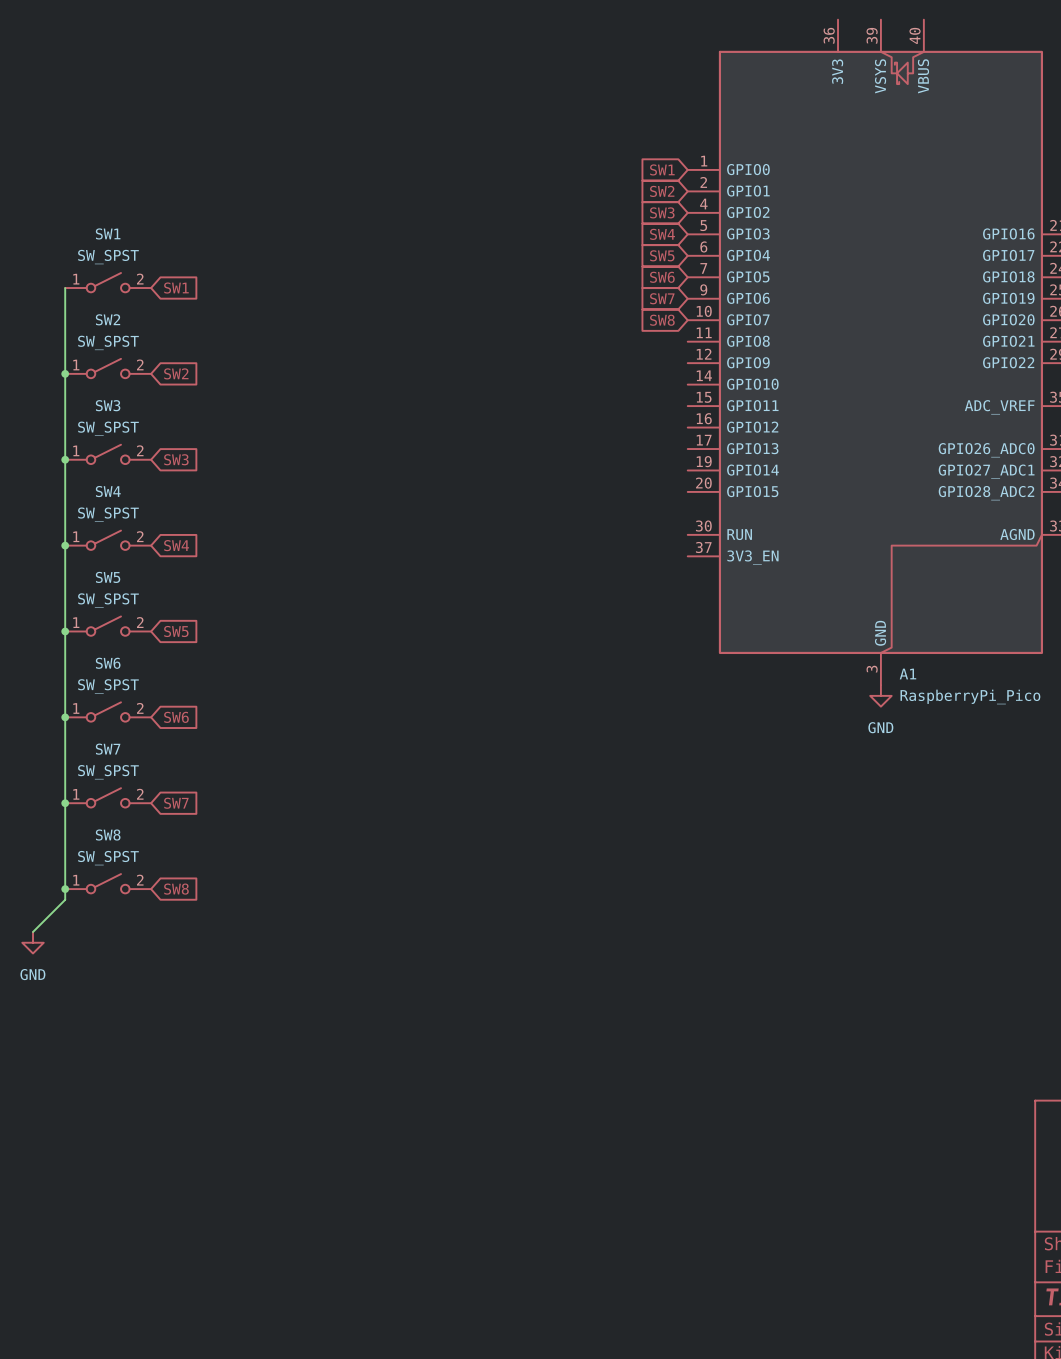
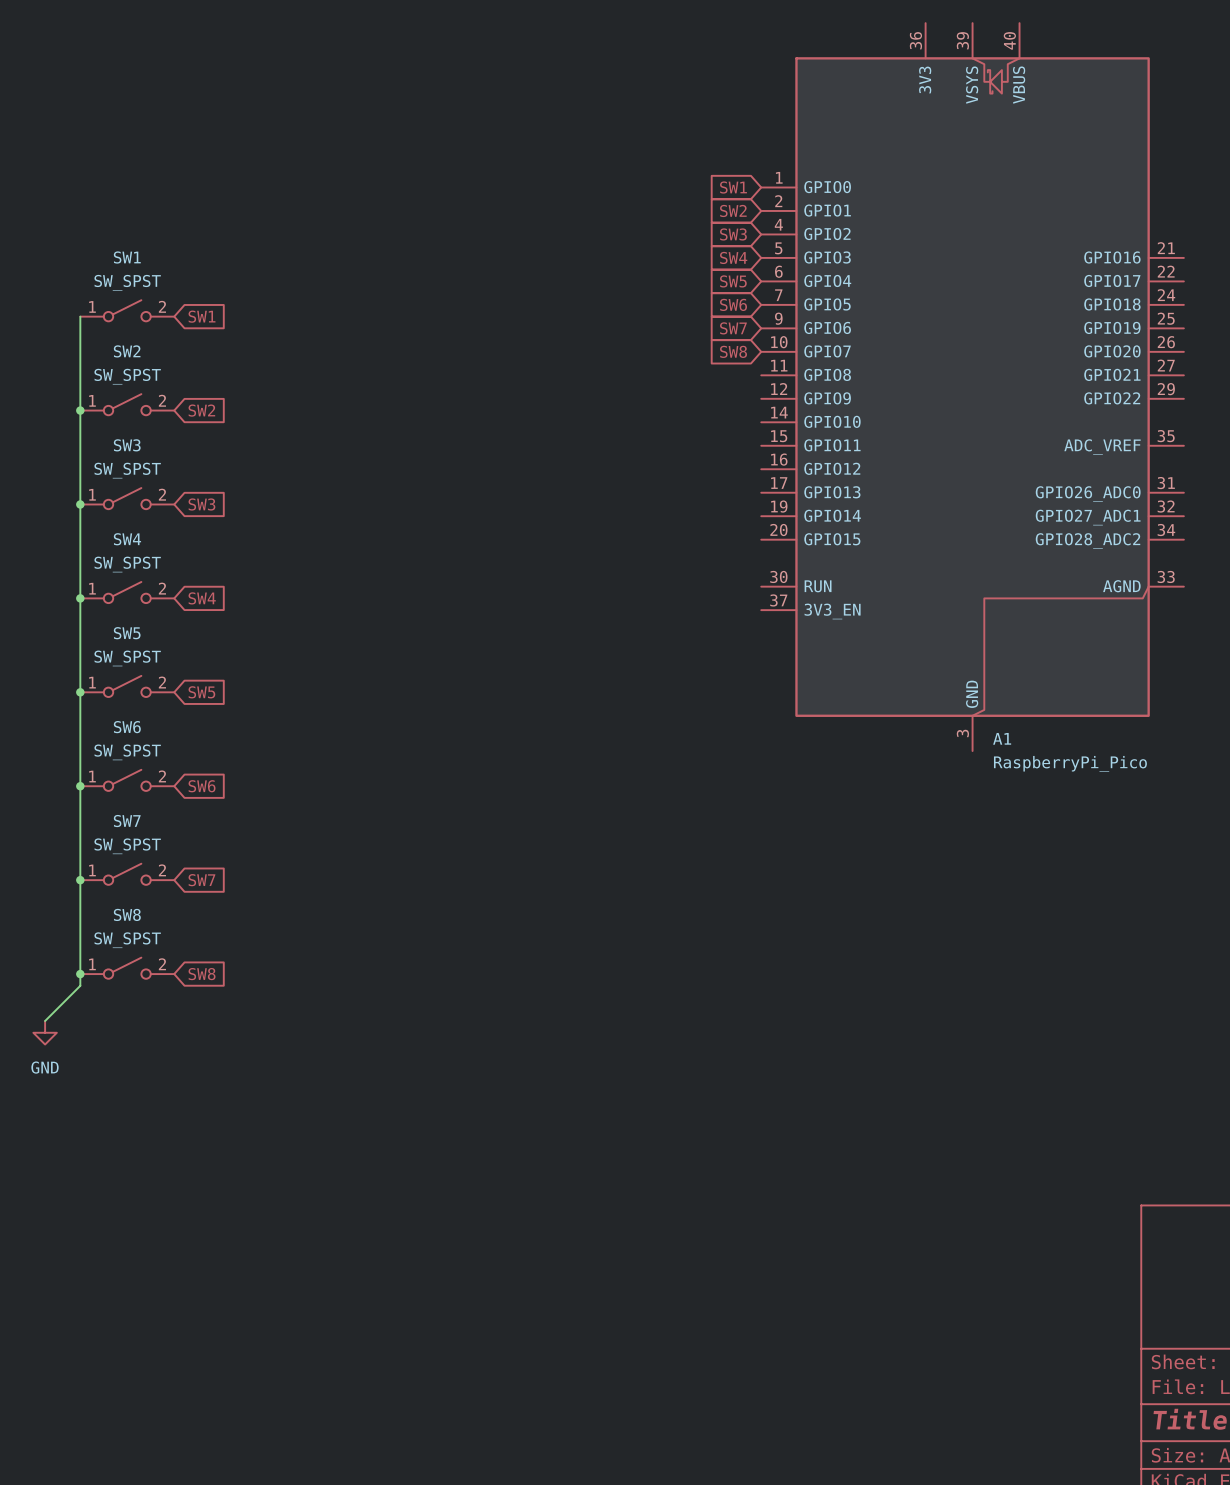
power symbol: GND (880, 695) -> none

